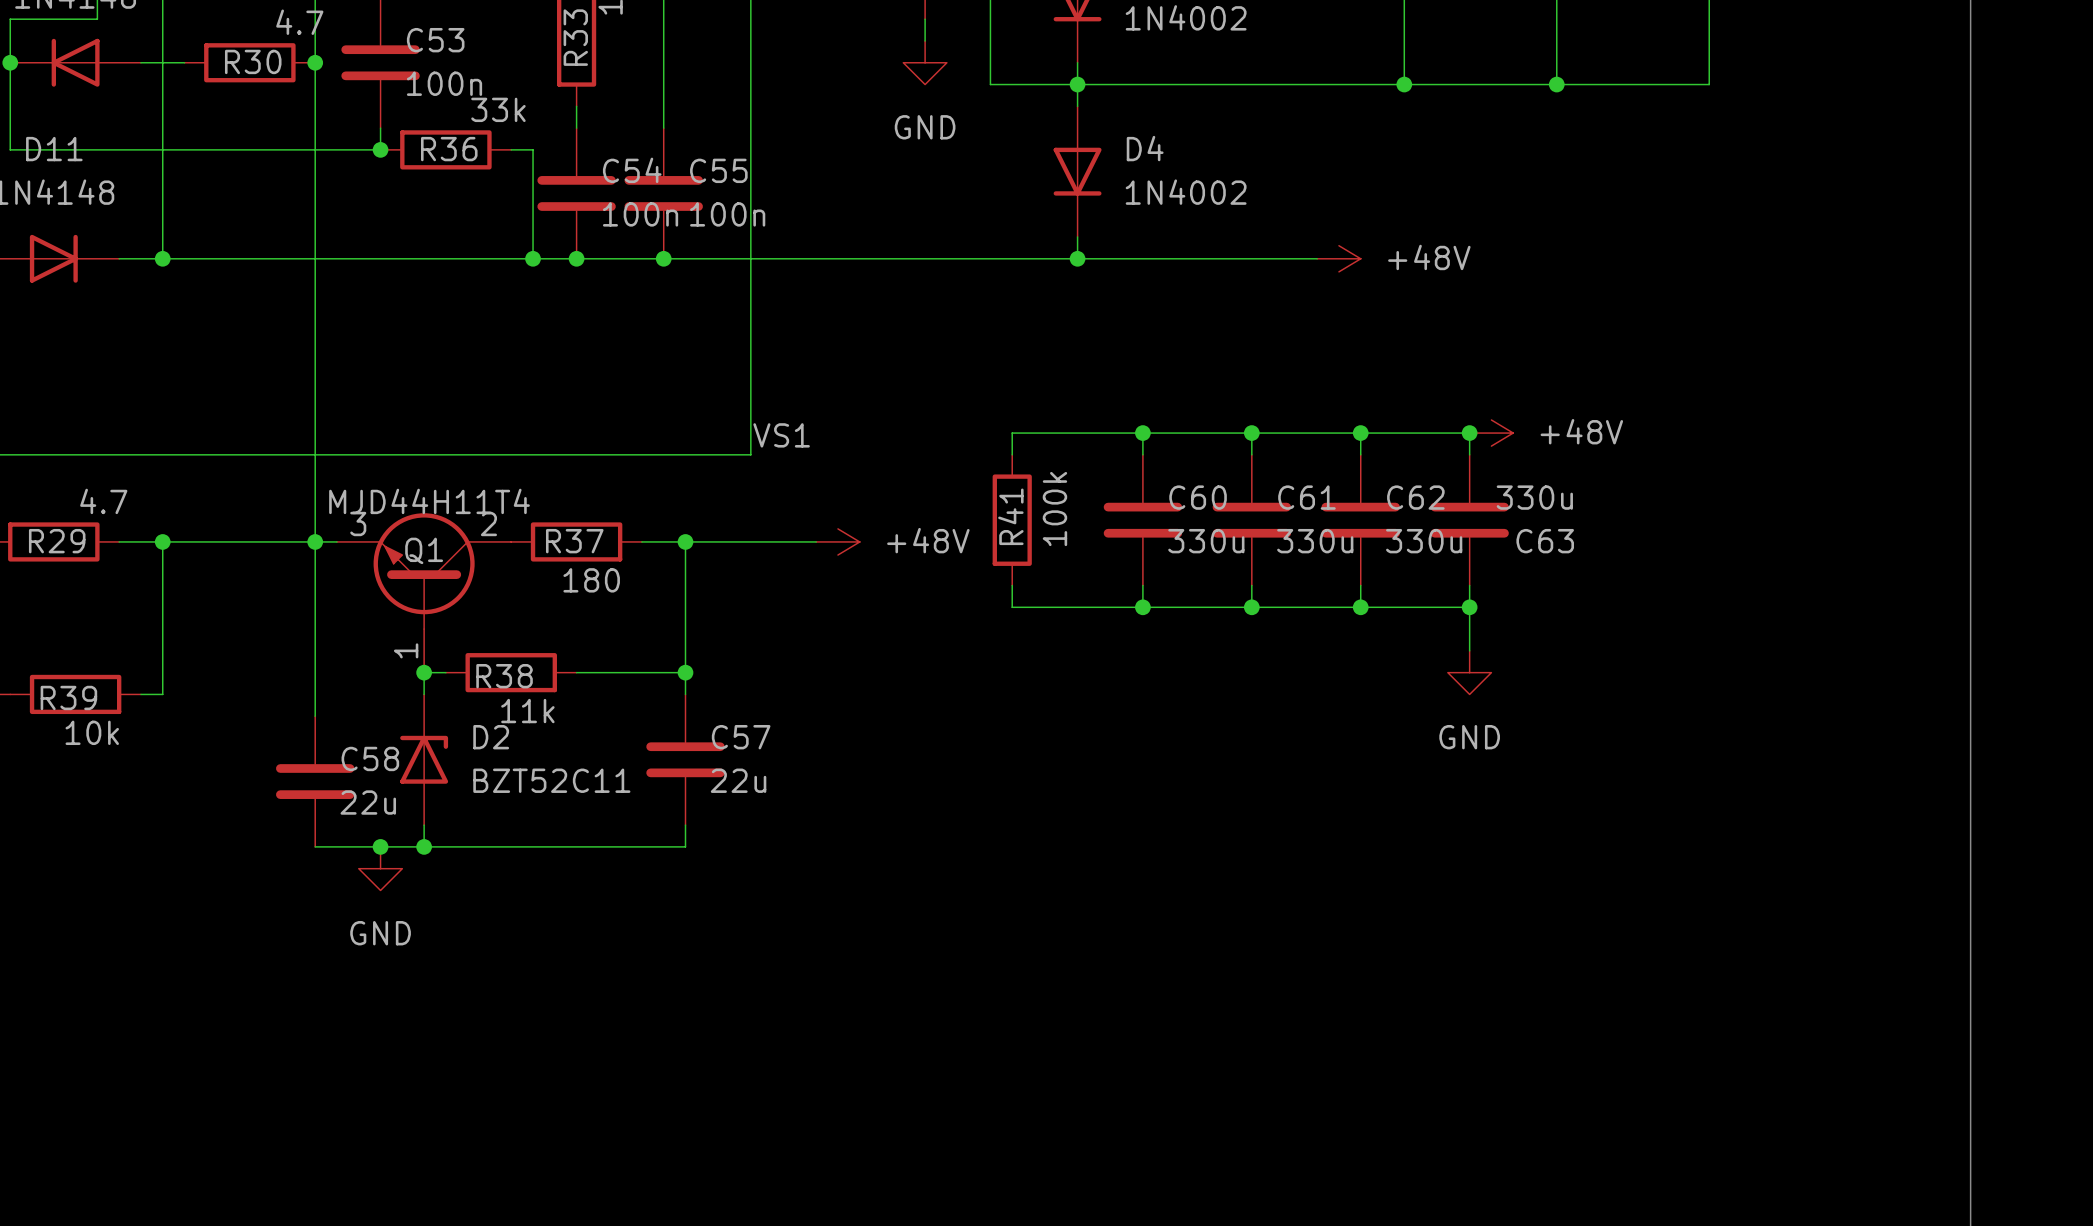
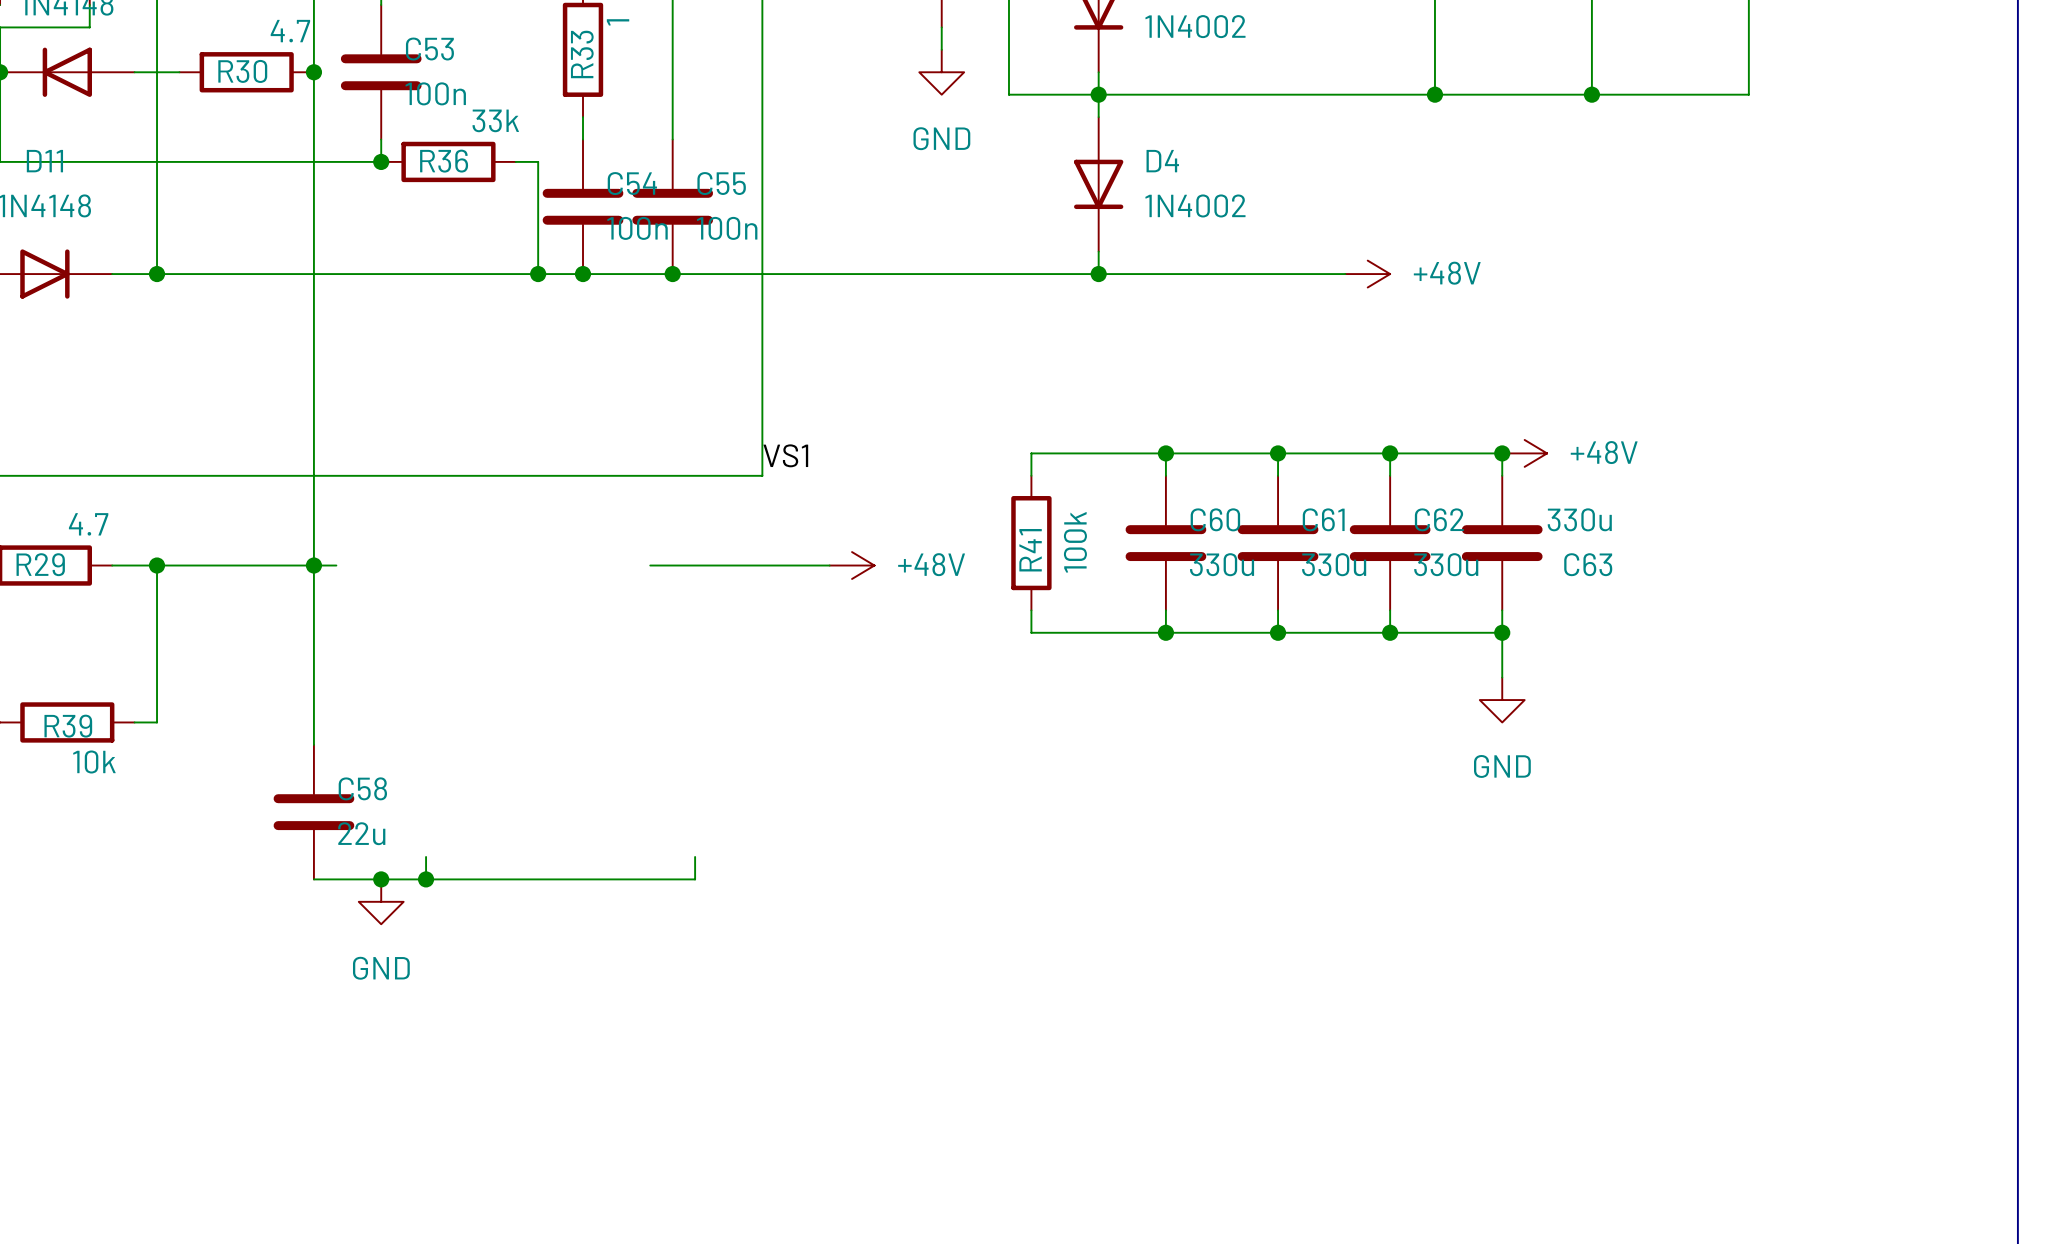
R37: 180 (576, 541) -> none
wire: (685, 541) (685, 694) -> none
junction: (685, 541) -> none
Q1: MJD44H11T4 (424, 592) -> none
junction: (424, 672) -> none
wire: (445, 672) (424, 672) (424, 694) -> none
R38: 11k (511, 672) -> none
wire: (576, 672) (685, 672) -> none
junction: (685, 672) -> none
D2: BZT52C11 (424, 759) -> none
C57: 22u (685, 759) -> none

